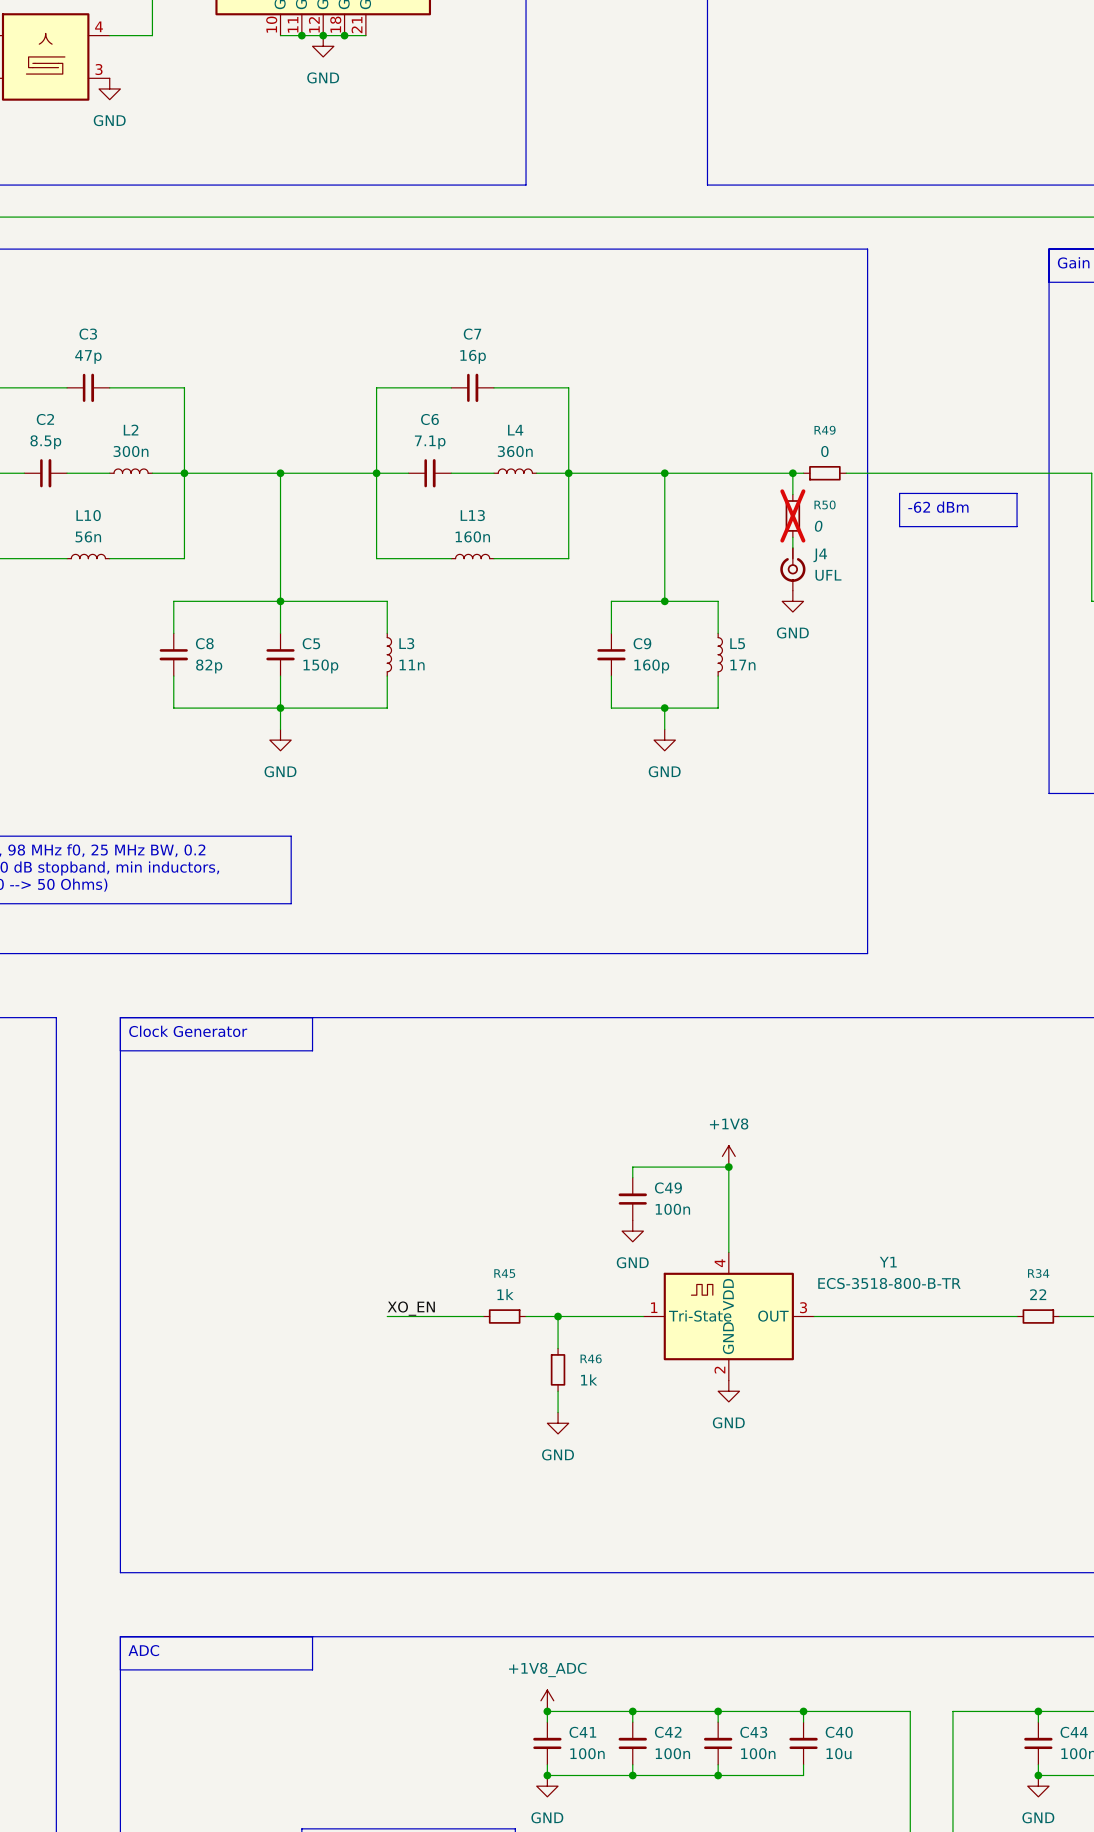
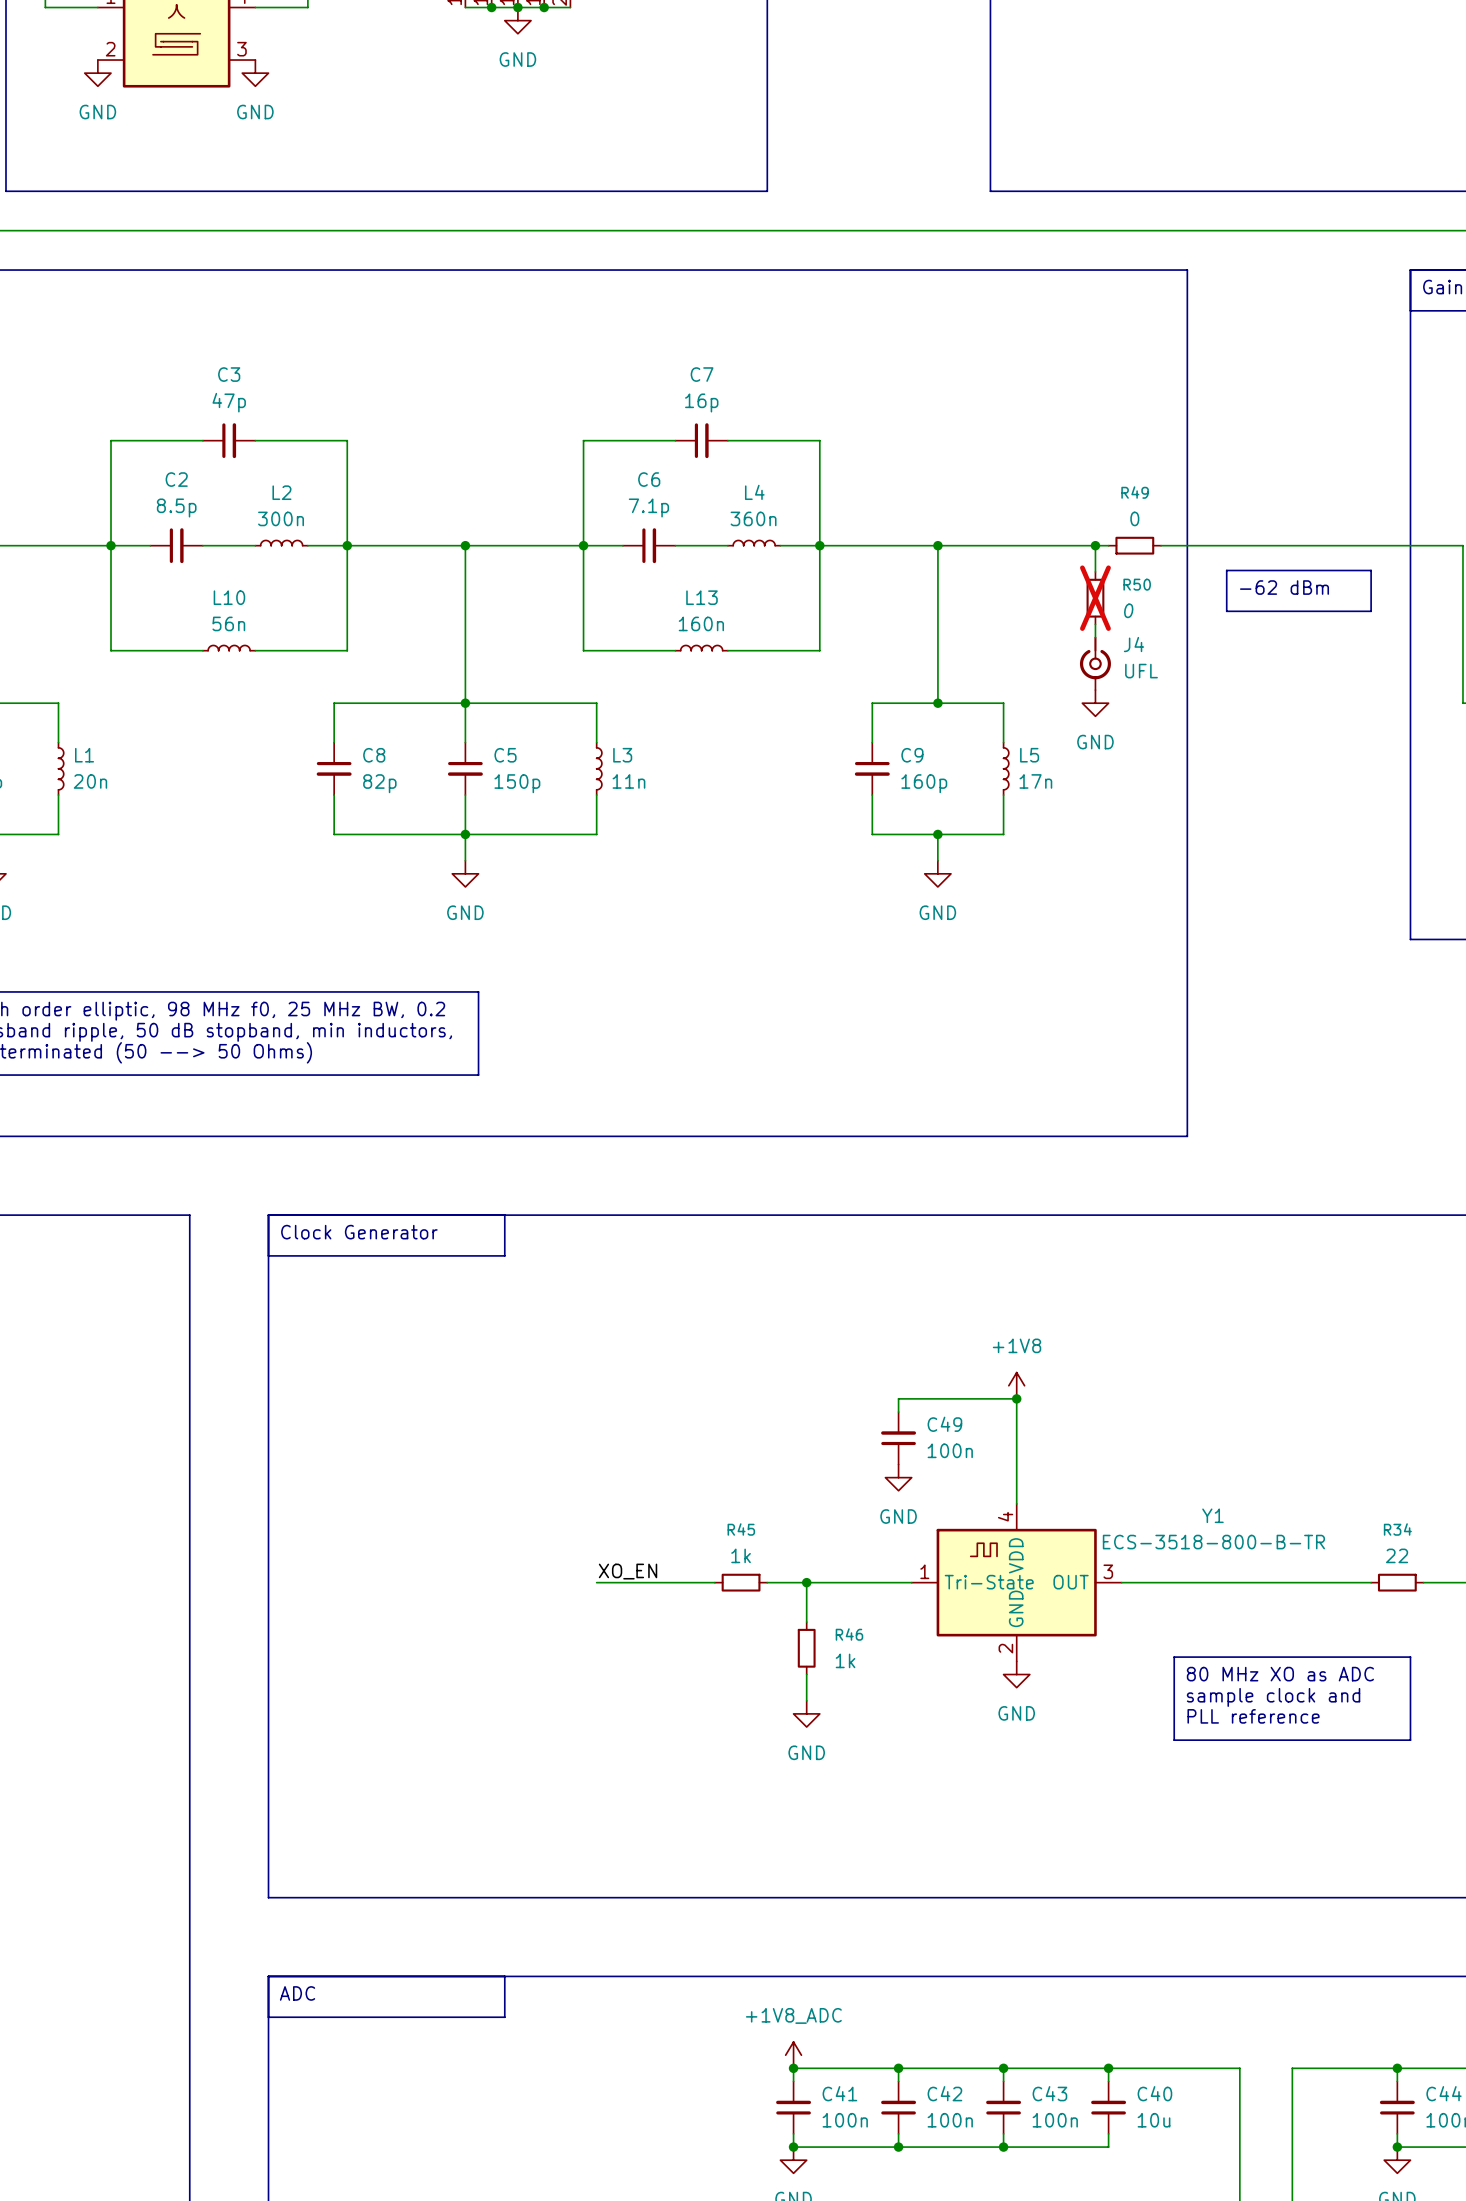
line: none -> (1174, 1657) (1410, 1657) (1410, 1740) (1174, 1740) (1174, 1657)
text: none -> 80 MHz XO as ADC (1280, 1674)
text: none -> sample clock and (1273, 1697)
text: none -> PLL reference (1253, 1716)

